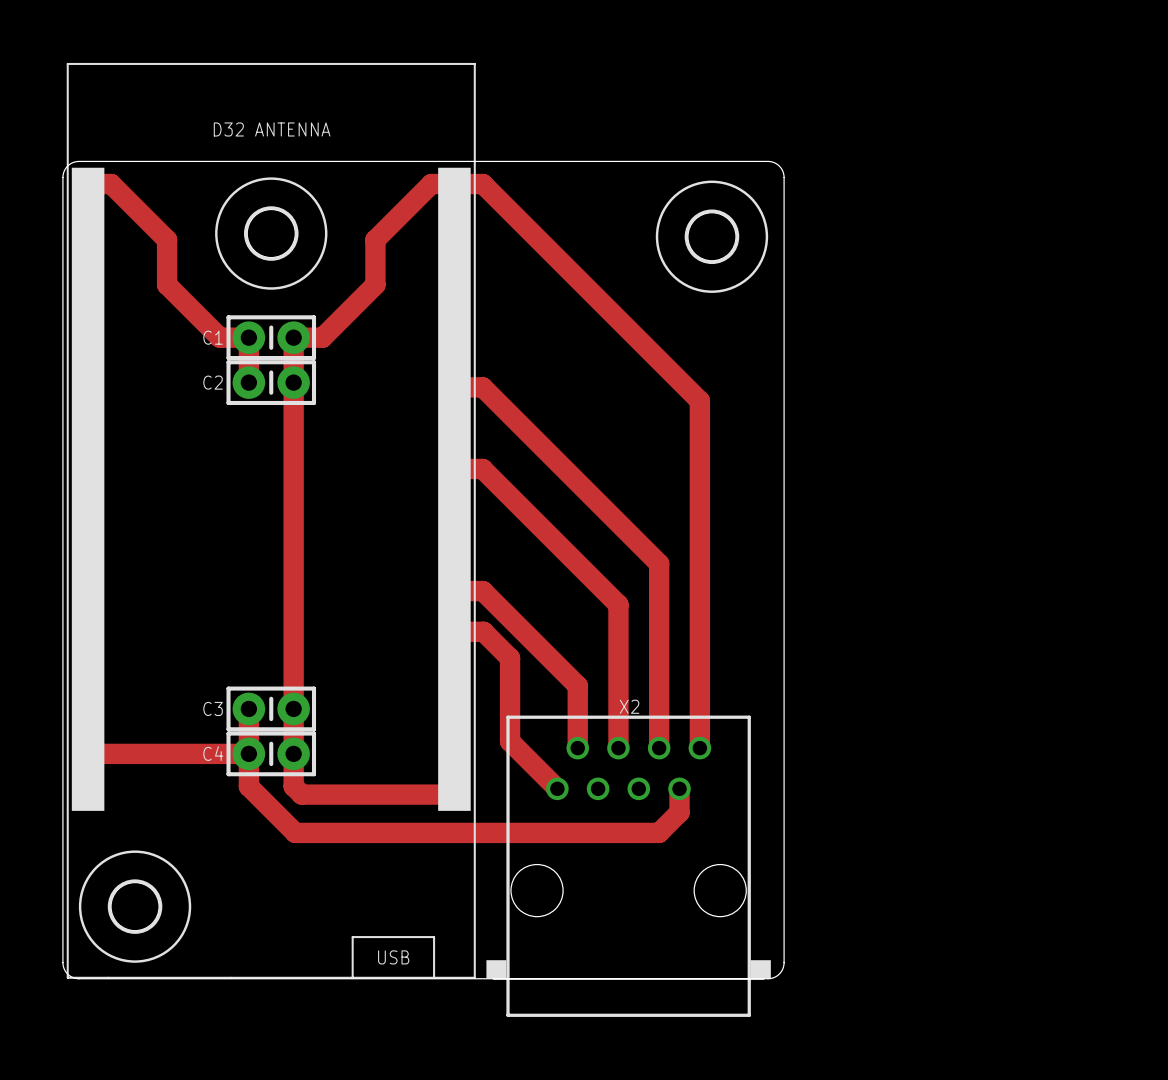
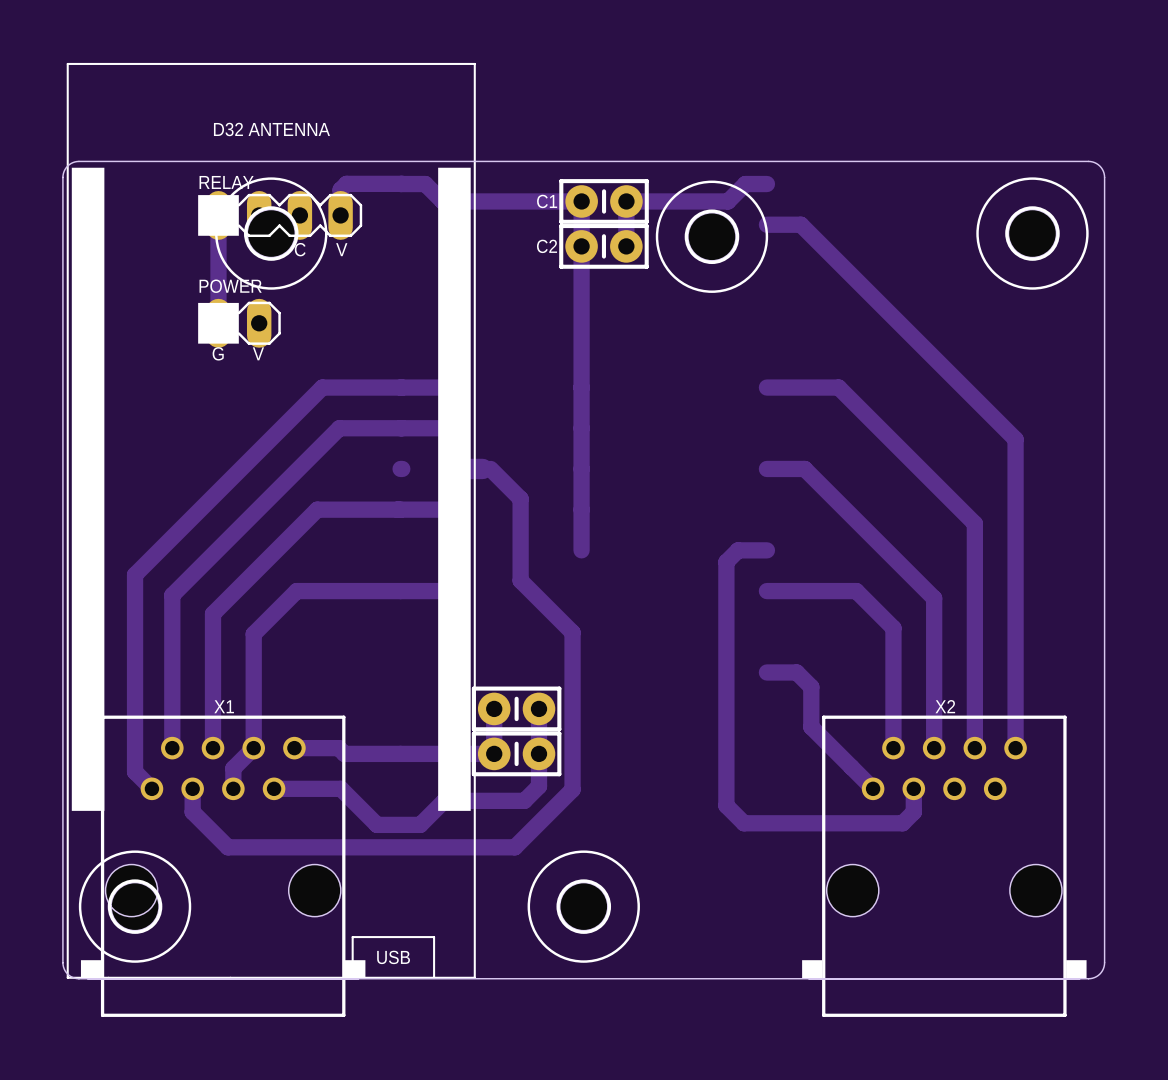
board edge: (768, 161) (779, 166) (784, 177) (784, 962) (779, 974) (768, 978) -> (768, 161) (1088, 161) (1099, 166) (1104, 177) (1103, 968) (1098, 975) (1088, 978) (768, 978)
track: (88, 184) (111, 184) (167, 239) (167, 284) (219, 337) (248, 337) (248, 382) -> none
track: none -> (766, 184) (745, 184) (728, 201) (626, 201) (626, 246)
track: none -> (218, 215) (218, 323)
RELAY: none -> (280, 215)
track: none -> (340, 215) (340, 189) (346, 183) (425, 184) (442, 201) (581, 201) (581, 246)
track: none -> (766, 224) (800, 224) (1015, 439) (1015, 748)
part: none -> (1032, 233)
track: none -> (581, 246) (581, 550)
text: none -> C (300, 249)
text: none -> V (341, 249)
POWER: none -> (239, 323)
C1 position: (271, 337) -> (604, 201)
text: none -> G (218, 353)
text: none -> V (258, 353)
C2 position: (271, 382) -> (603, 246)
track: (454, 387) (482, 387) (659, 563) (659, 748) -> none
track: none -> (459, 387) (322, 387) (135, 574) (135, 771) (151, 788)
track: none -> (766, 387) (838, 387) (974, 523) (974, 748)
track: none -> (459, 428) (339, 428) (172, 595) (172, 748)
track: none -> (400, 468) (402, 468)
track: (482, 468) (618, 604) (618, 748) -> none
track: none -> (490, 468) (520, 498) (520, 580) (572, 632) (572, 789) (514, 847) (227, 847) (192, 811) (192, 788)
track: none -> (766, 468) (804, 468) (934, 598) (934, 748)
track: none -> (459, 509) (317, 509) (213, 613) (213, 748)
track: none -> (459, 550) (459, 580) (448, 591) (296, 591) (253, 634) (253, 748) (233, 768) (233, 788)
track: none -> (766, 550) (738, 550) (726, 562) (726, 805) (744, 823) (902, 823) (913, 812) (913, 788)
track: (454, 591) (482, 591) (577, 685) (577, 748) -> none
track: none -> (766, 591) (856, 591) (893, 628) (893, 748)
track: (454, 631) (483, 631) (510, 658) (510, 741) (557, 788) -> none
track: none -> (766, 672) (796, 672) (811, 687) (811, 727) (873, 788)
track: (248, 708) (248, 786) (295, 832) (659, 832) (679, 812) (679, 788) -> none
C3 position: (271, 708) -> (516, 708)
track: none -> (494, 708) (494, 753) (344, 753) (338, 748) (294, 748)
track: none -> (539, 708) (539, 786) (524, 800) (444, 800) (420, 824) (377, 824) (340, 788) (274, 788)
track: (699, 748) (699, 400) (482, 184) (431, 184) (375, 239) (375, 284) (322, 337) (293, 337) (293, 786) (301, 794) (454, 794) -> none
track: (88, 753) (248, 753) -> none
C4 position: (271, 753) -> (516, 753)
X1: none -> (223, 866)
X2 position: (628, 866) -> (944, 866)
part: none -> (583, 906)

